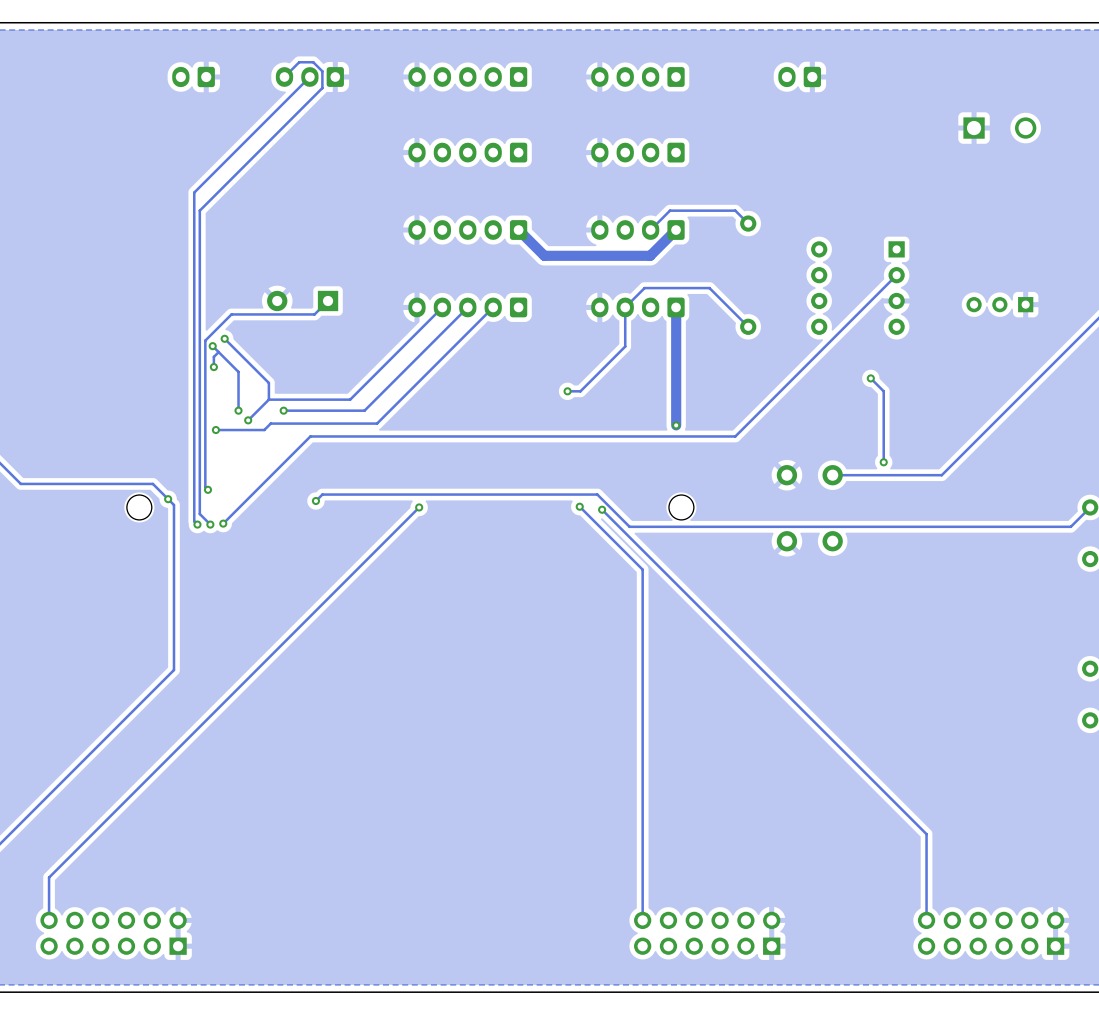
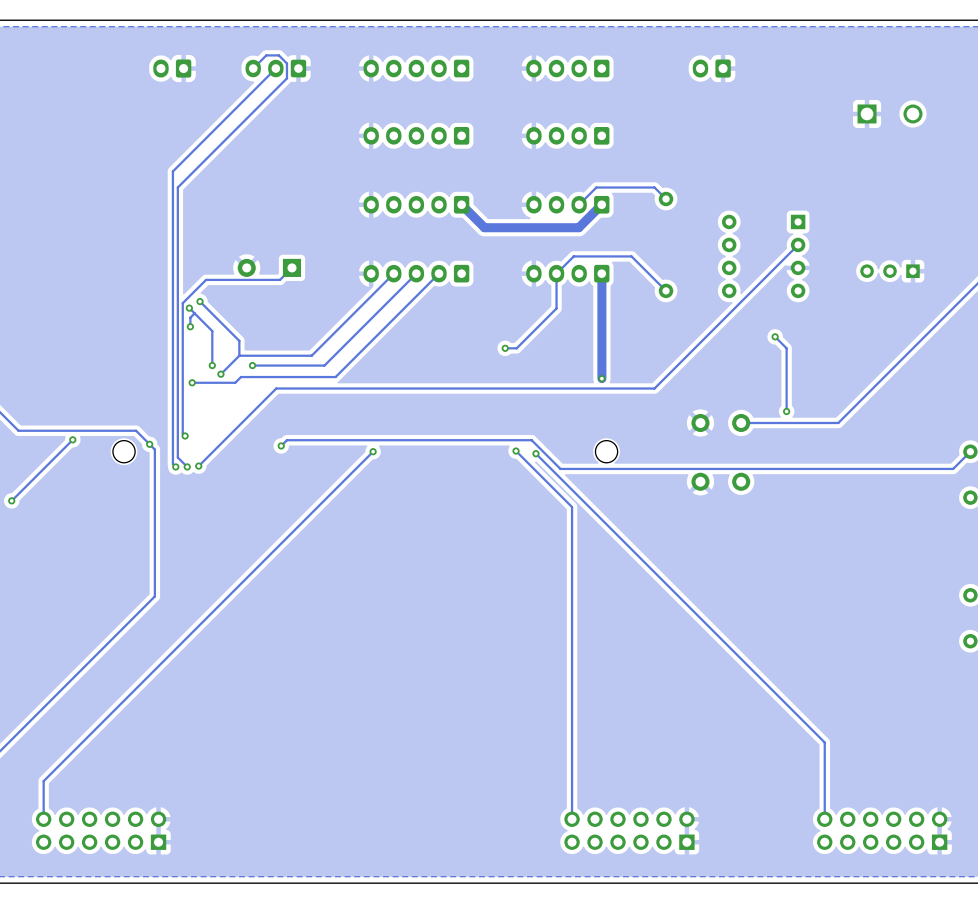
track: none -> (72, 439) (11, 500)
via: none -> (72, 439)
via: none -> (11, 500)

